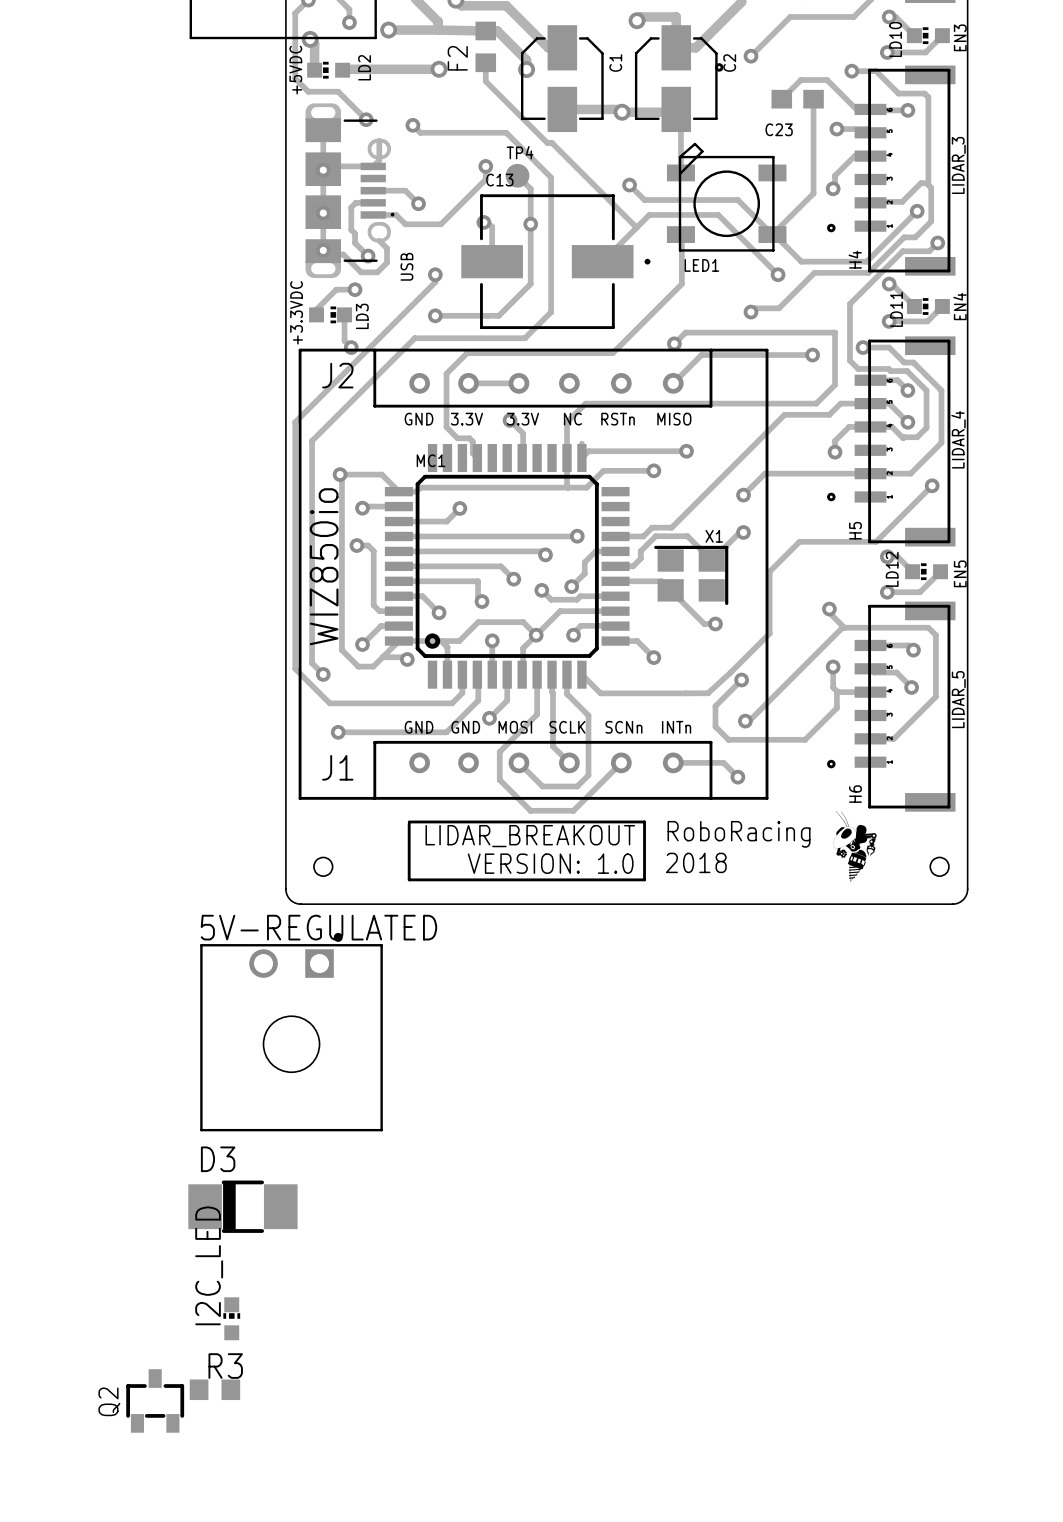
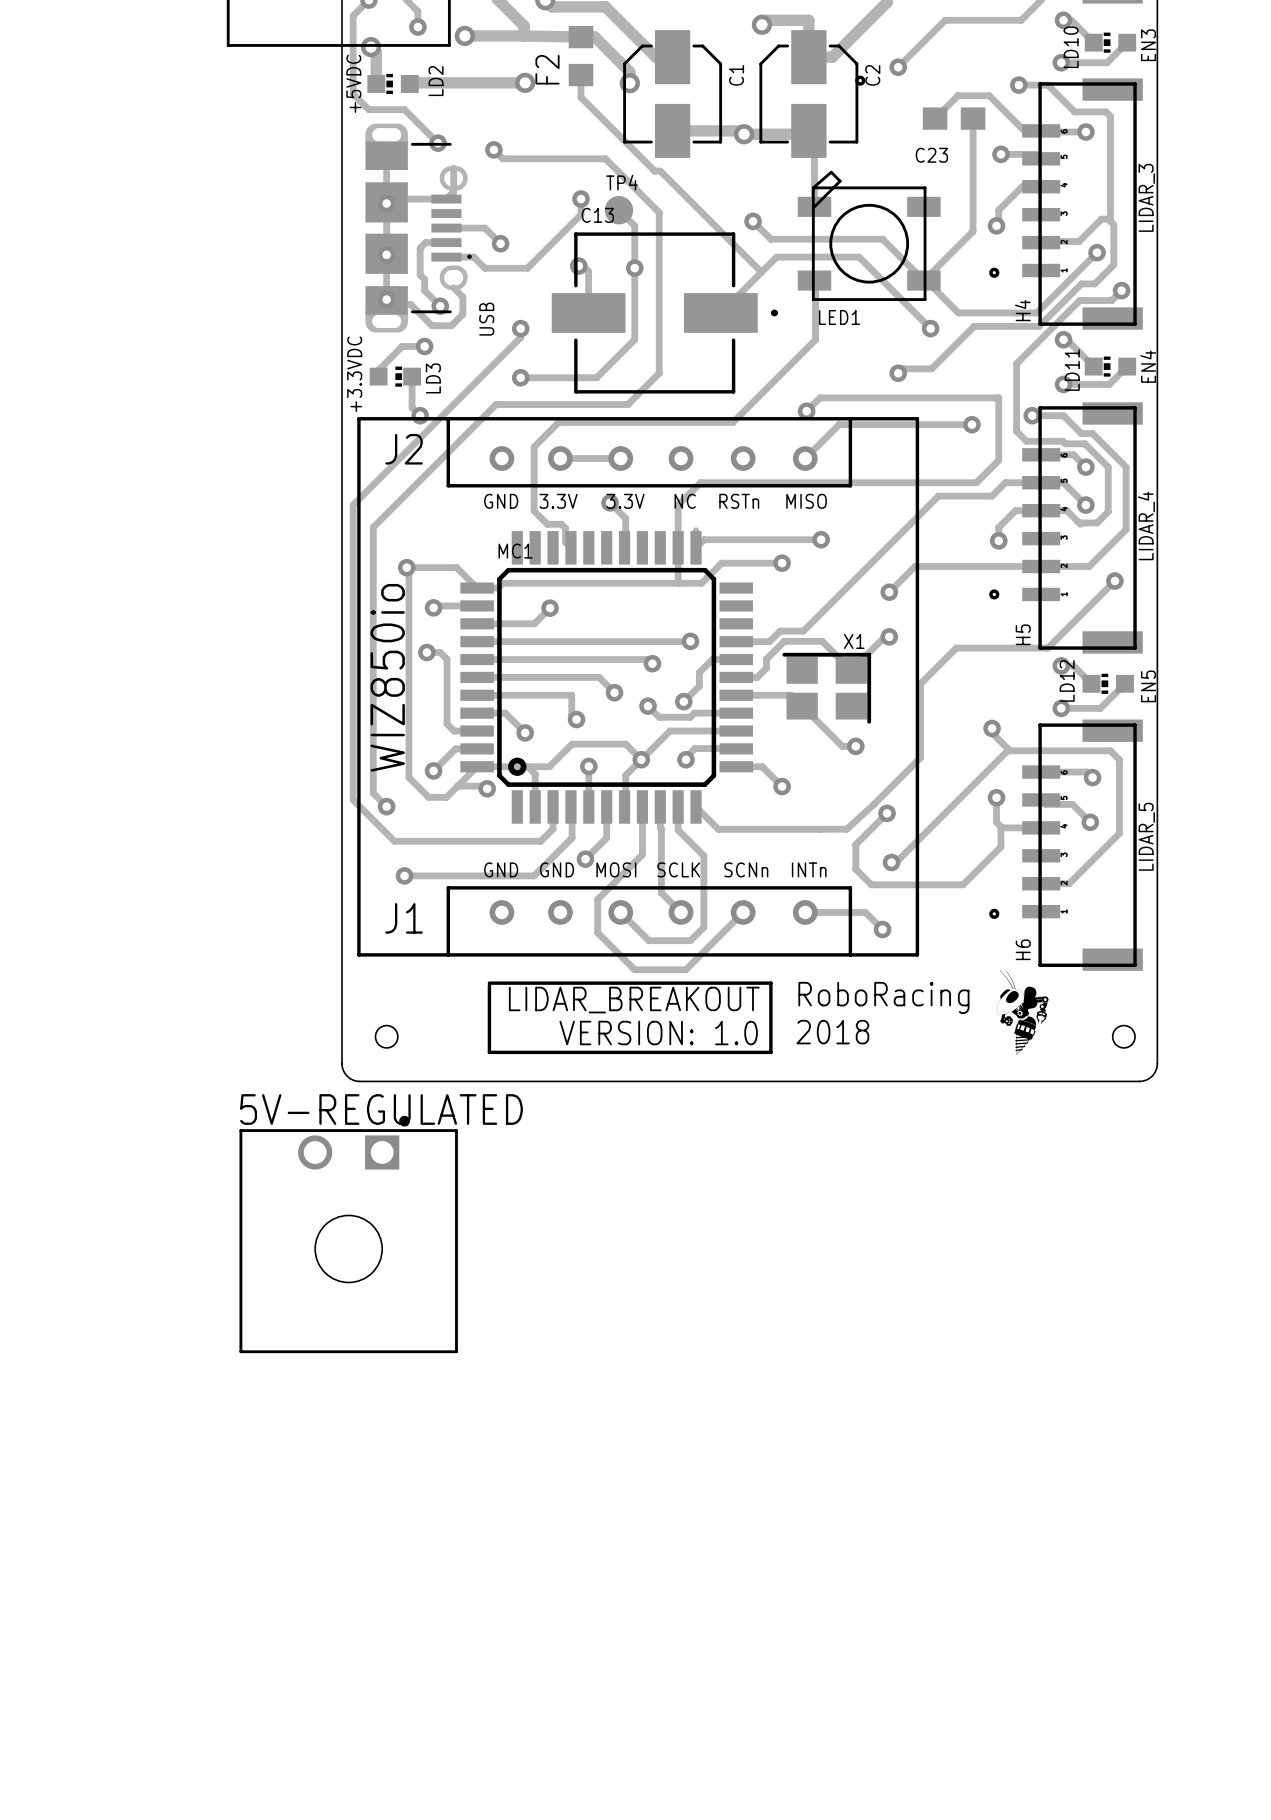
D3: (242, 1206) -> none
I2C_LED: (231, 1318) -> none
R3: (214, 1389) -> none
Q2: (155, 1400) -> none

